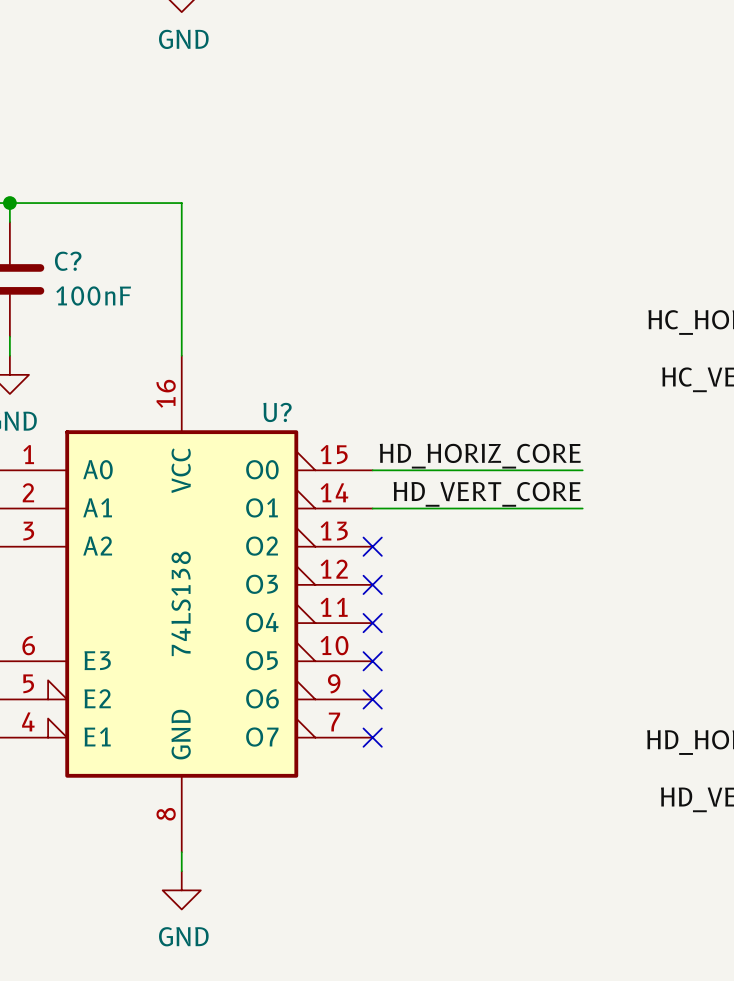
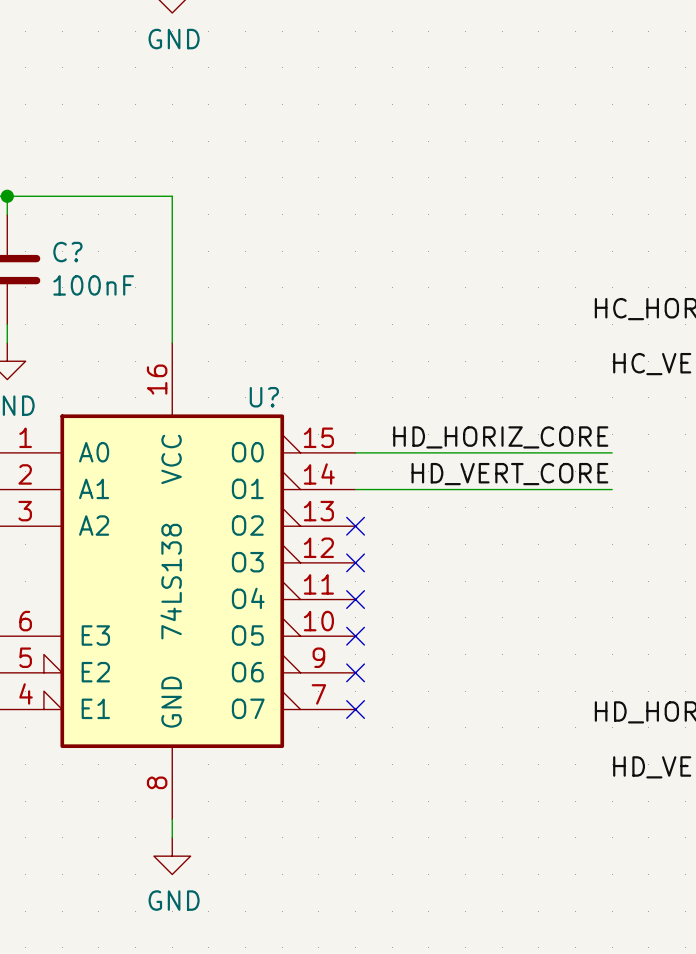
label position: HD_HORIZ_CORE (480, 456) -> HD_HORIZ_CORE (500, 437)
wire: none -> (557, 452) (612, 452)
label position: HD_VERT_CORE (487, 494) -> HD_VERT_CORE (509, 474)
wire: none -> (557, 489) (612, 489)

